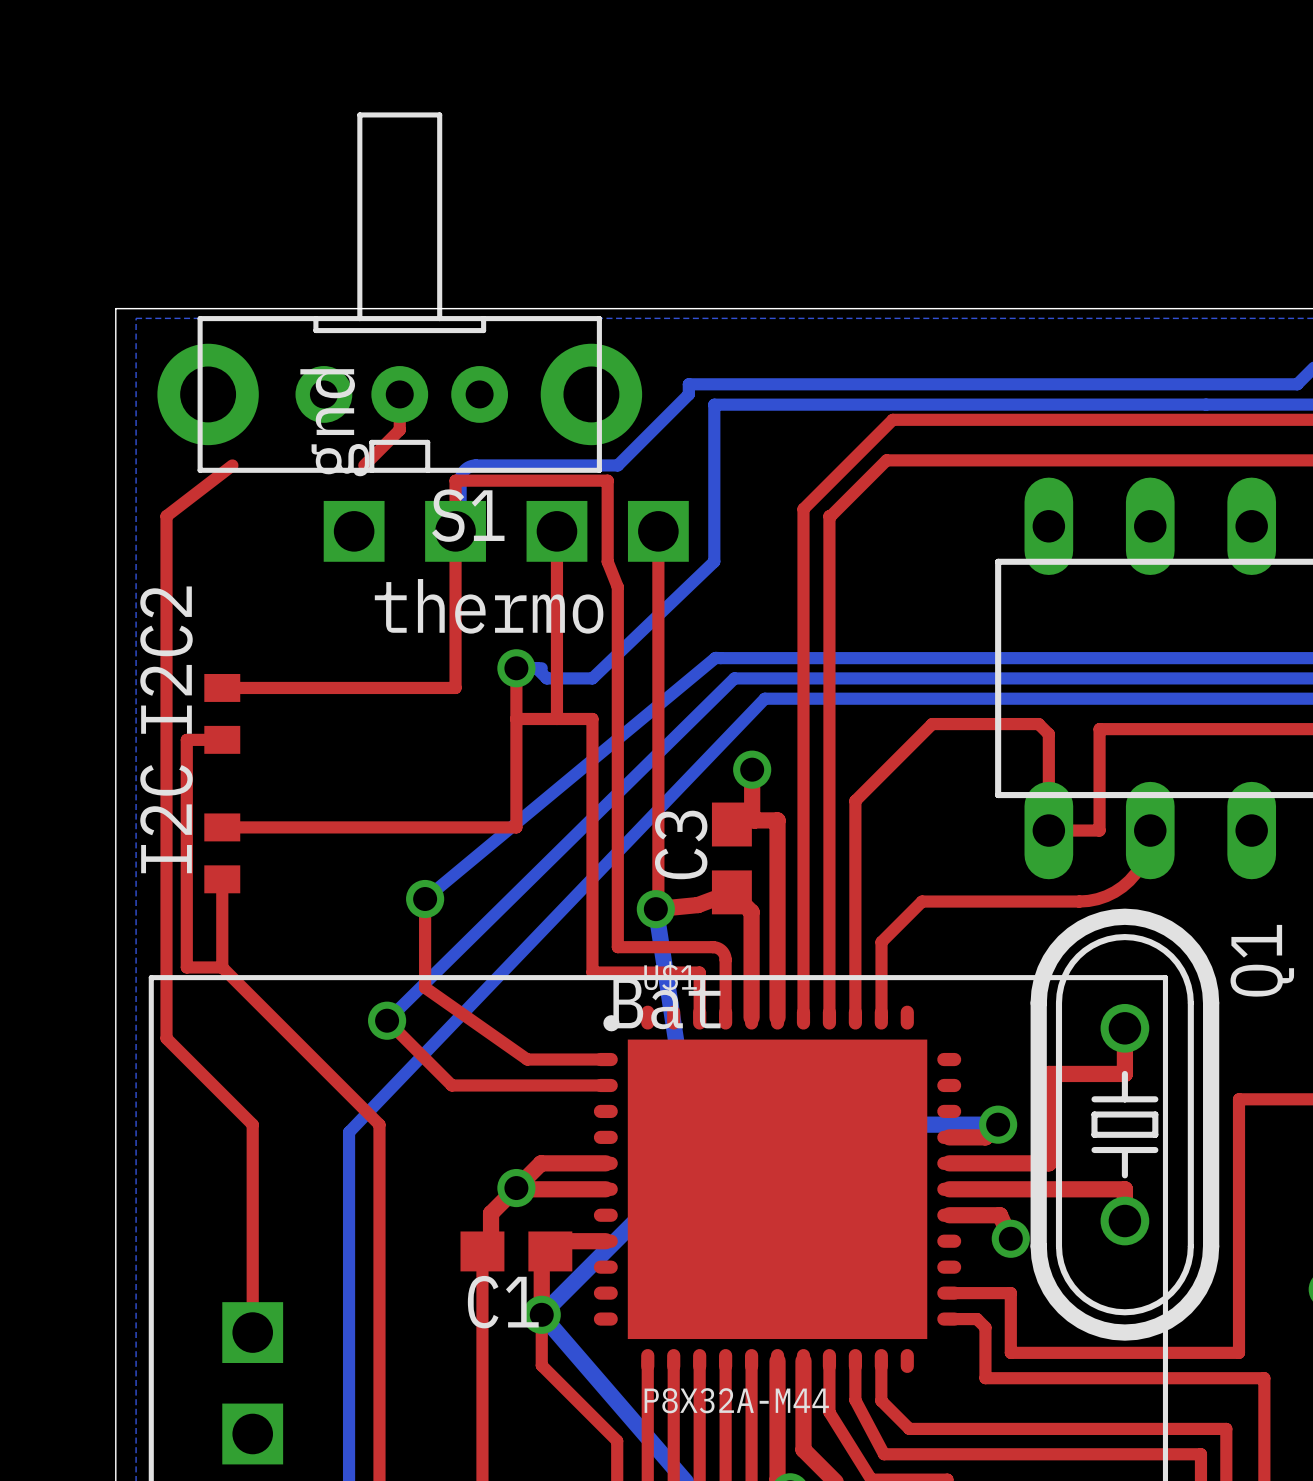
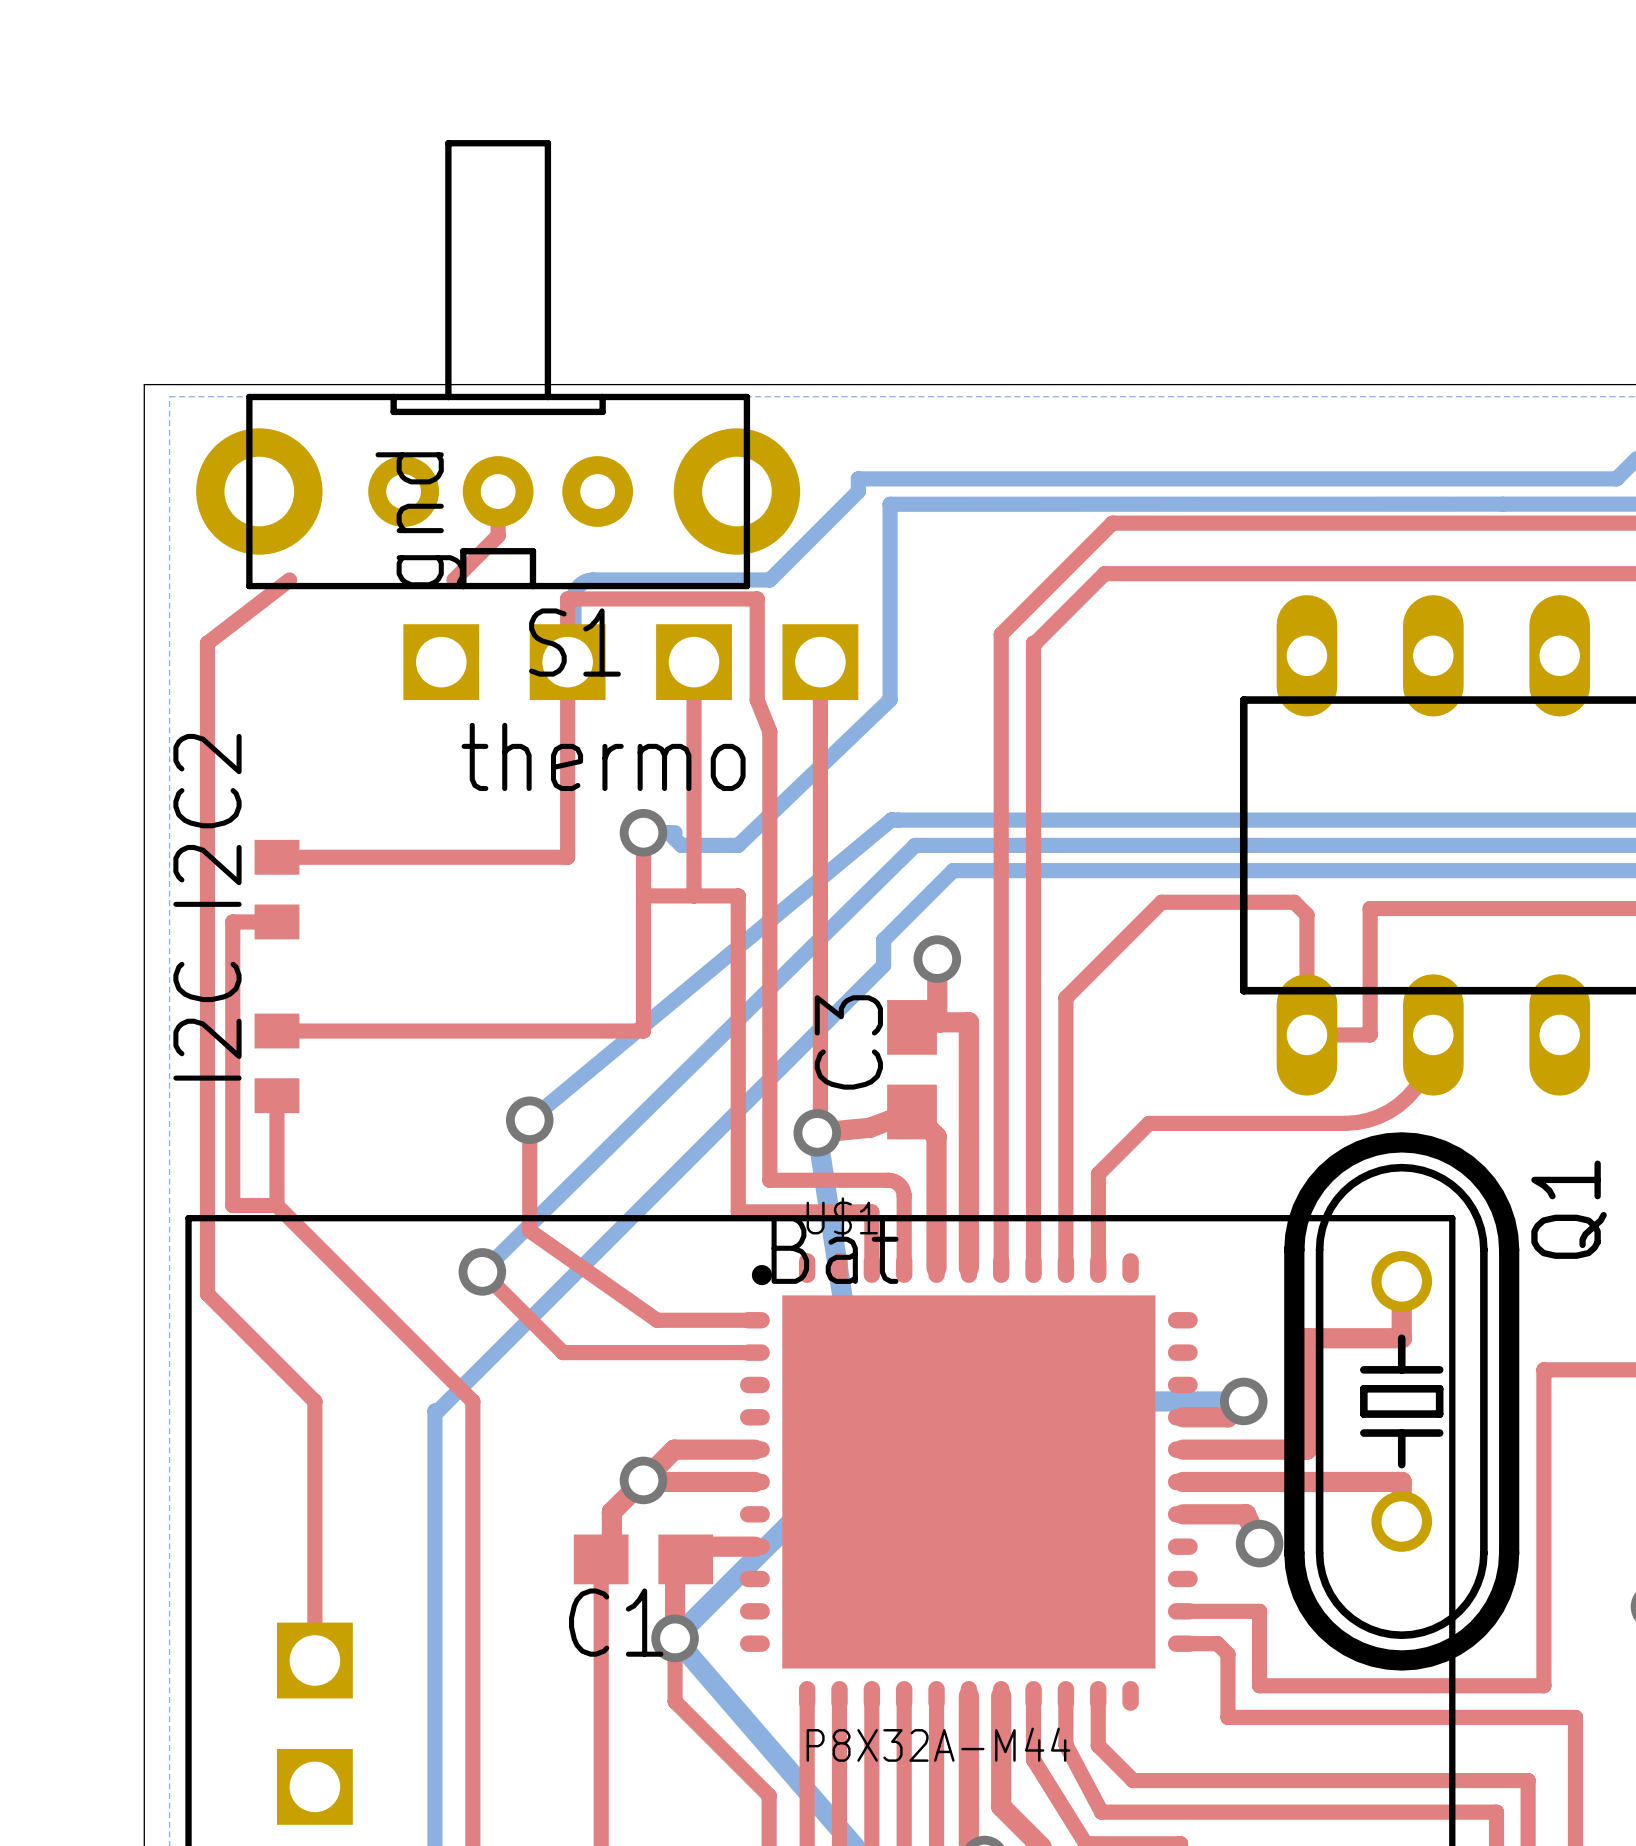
bottom track: (764, 698) (349, 1132) -> (953, 870) (883, 940) (883, 965) (438, 1410) (434, 1410)

